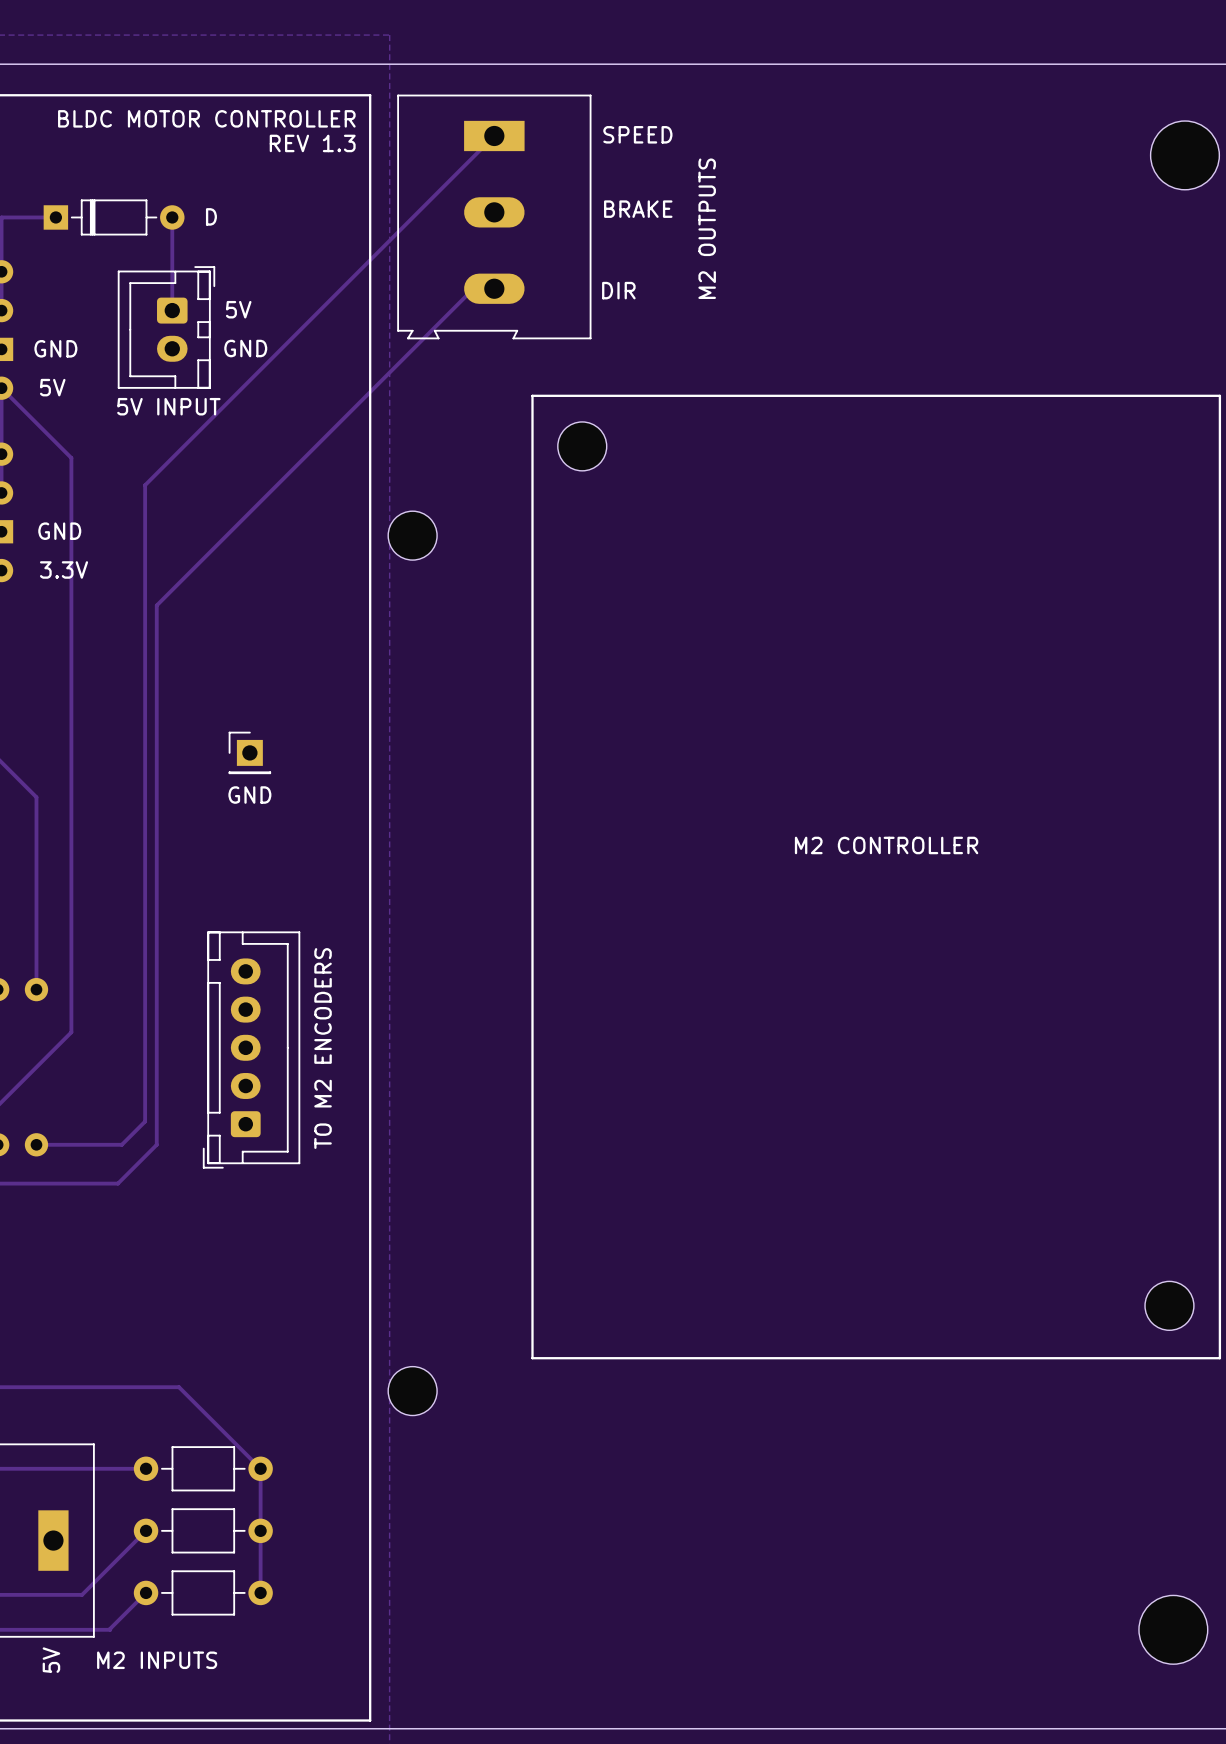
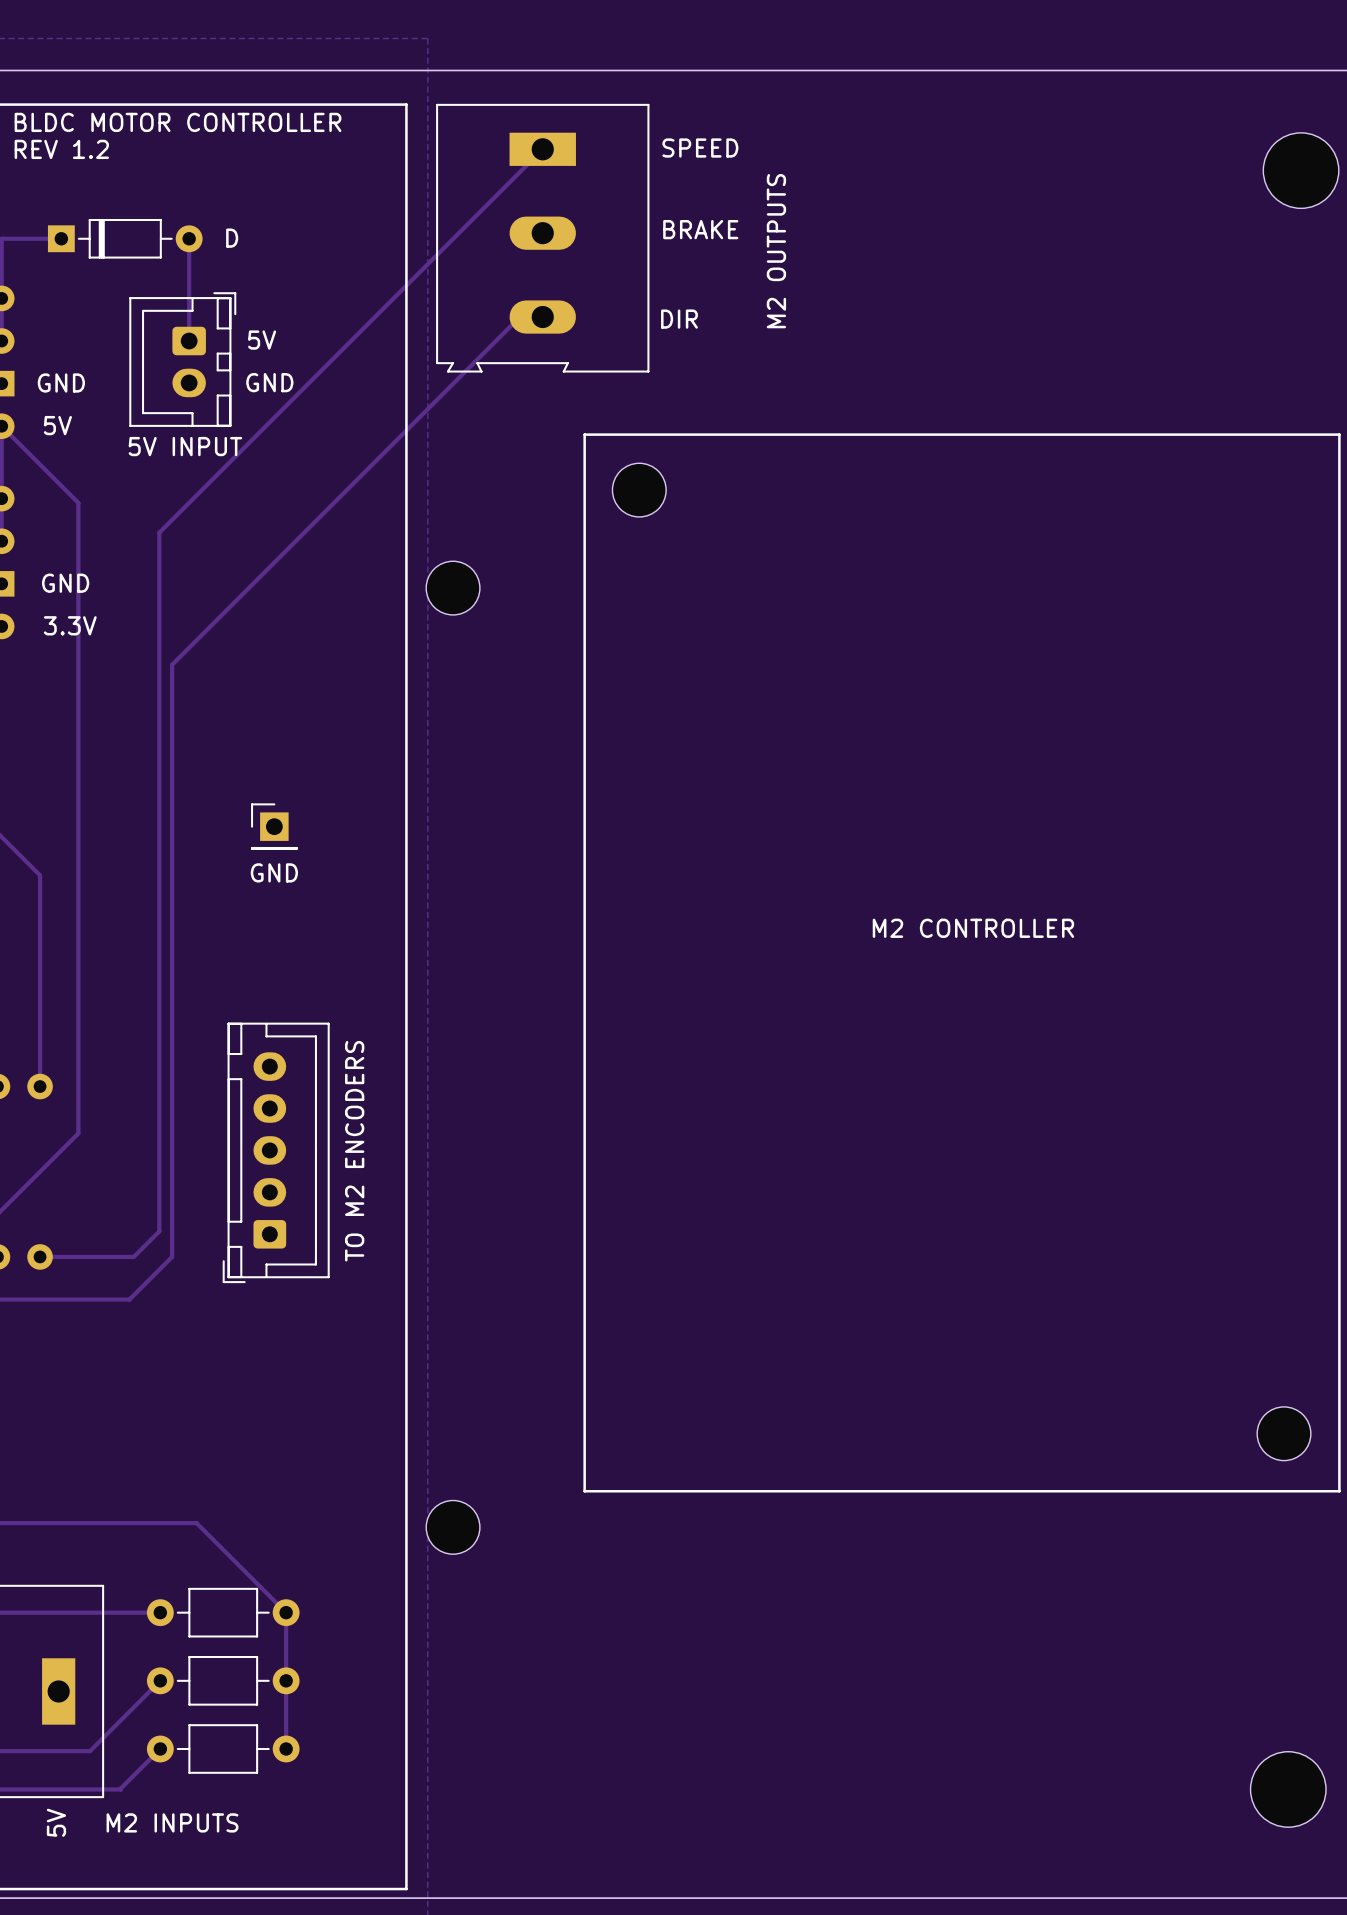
text position: BLDC MOTOR CONTROLLER (206, 118) -> BLDC MOTOR CONTROLLER (178, 122)
text: none -> REV 1.2 (61, 149)
text: REV 1.3 (312, 143) -> none

